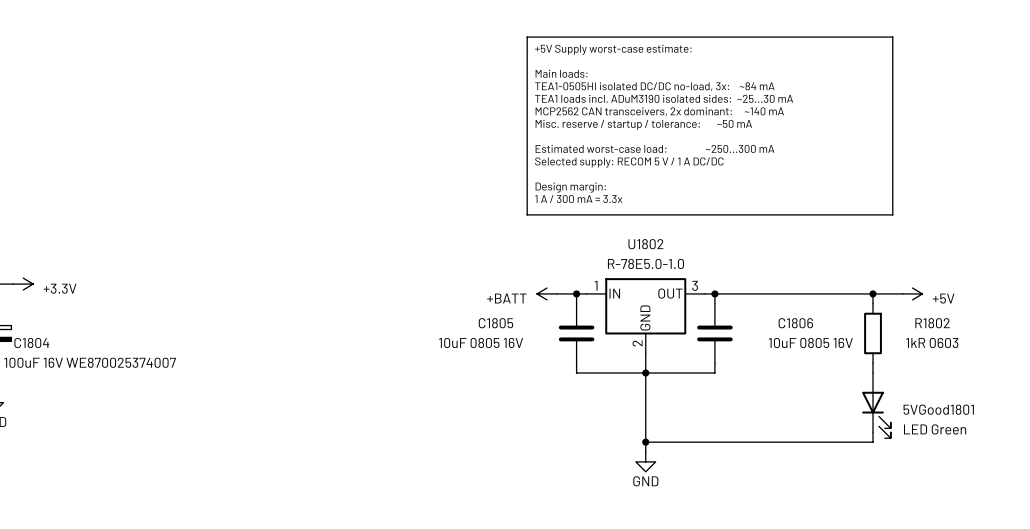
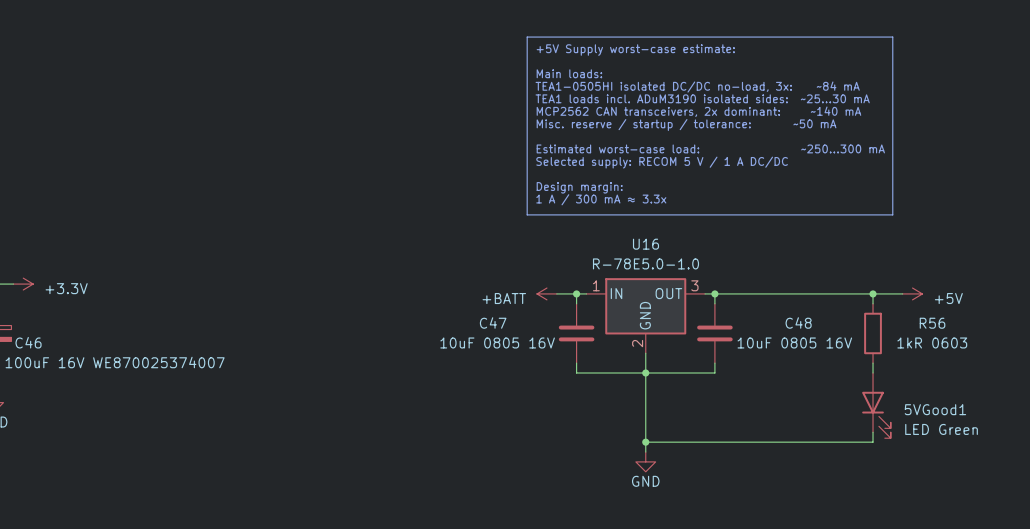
U1802 name: U1802 (645, 244) -> U16 (645, 244)
C1805 name: C1805 (495, 323) -> C47 (493, 322)
C1806 name: C1806 (795, 323) -> C48 (798, 322)
R1802 name: R1802 (932, 323) -> R56 (932, 323)
C1804 name: C1804 (31, 342) -> C46 (28, 342)
5VGood1801 name: 5VGood1801 (938, 409) -> 5VGood1 (935, 409)

